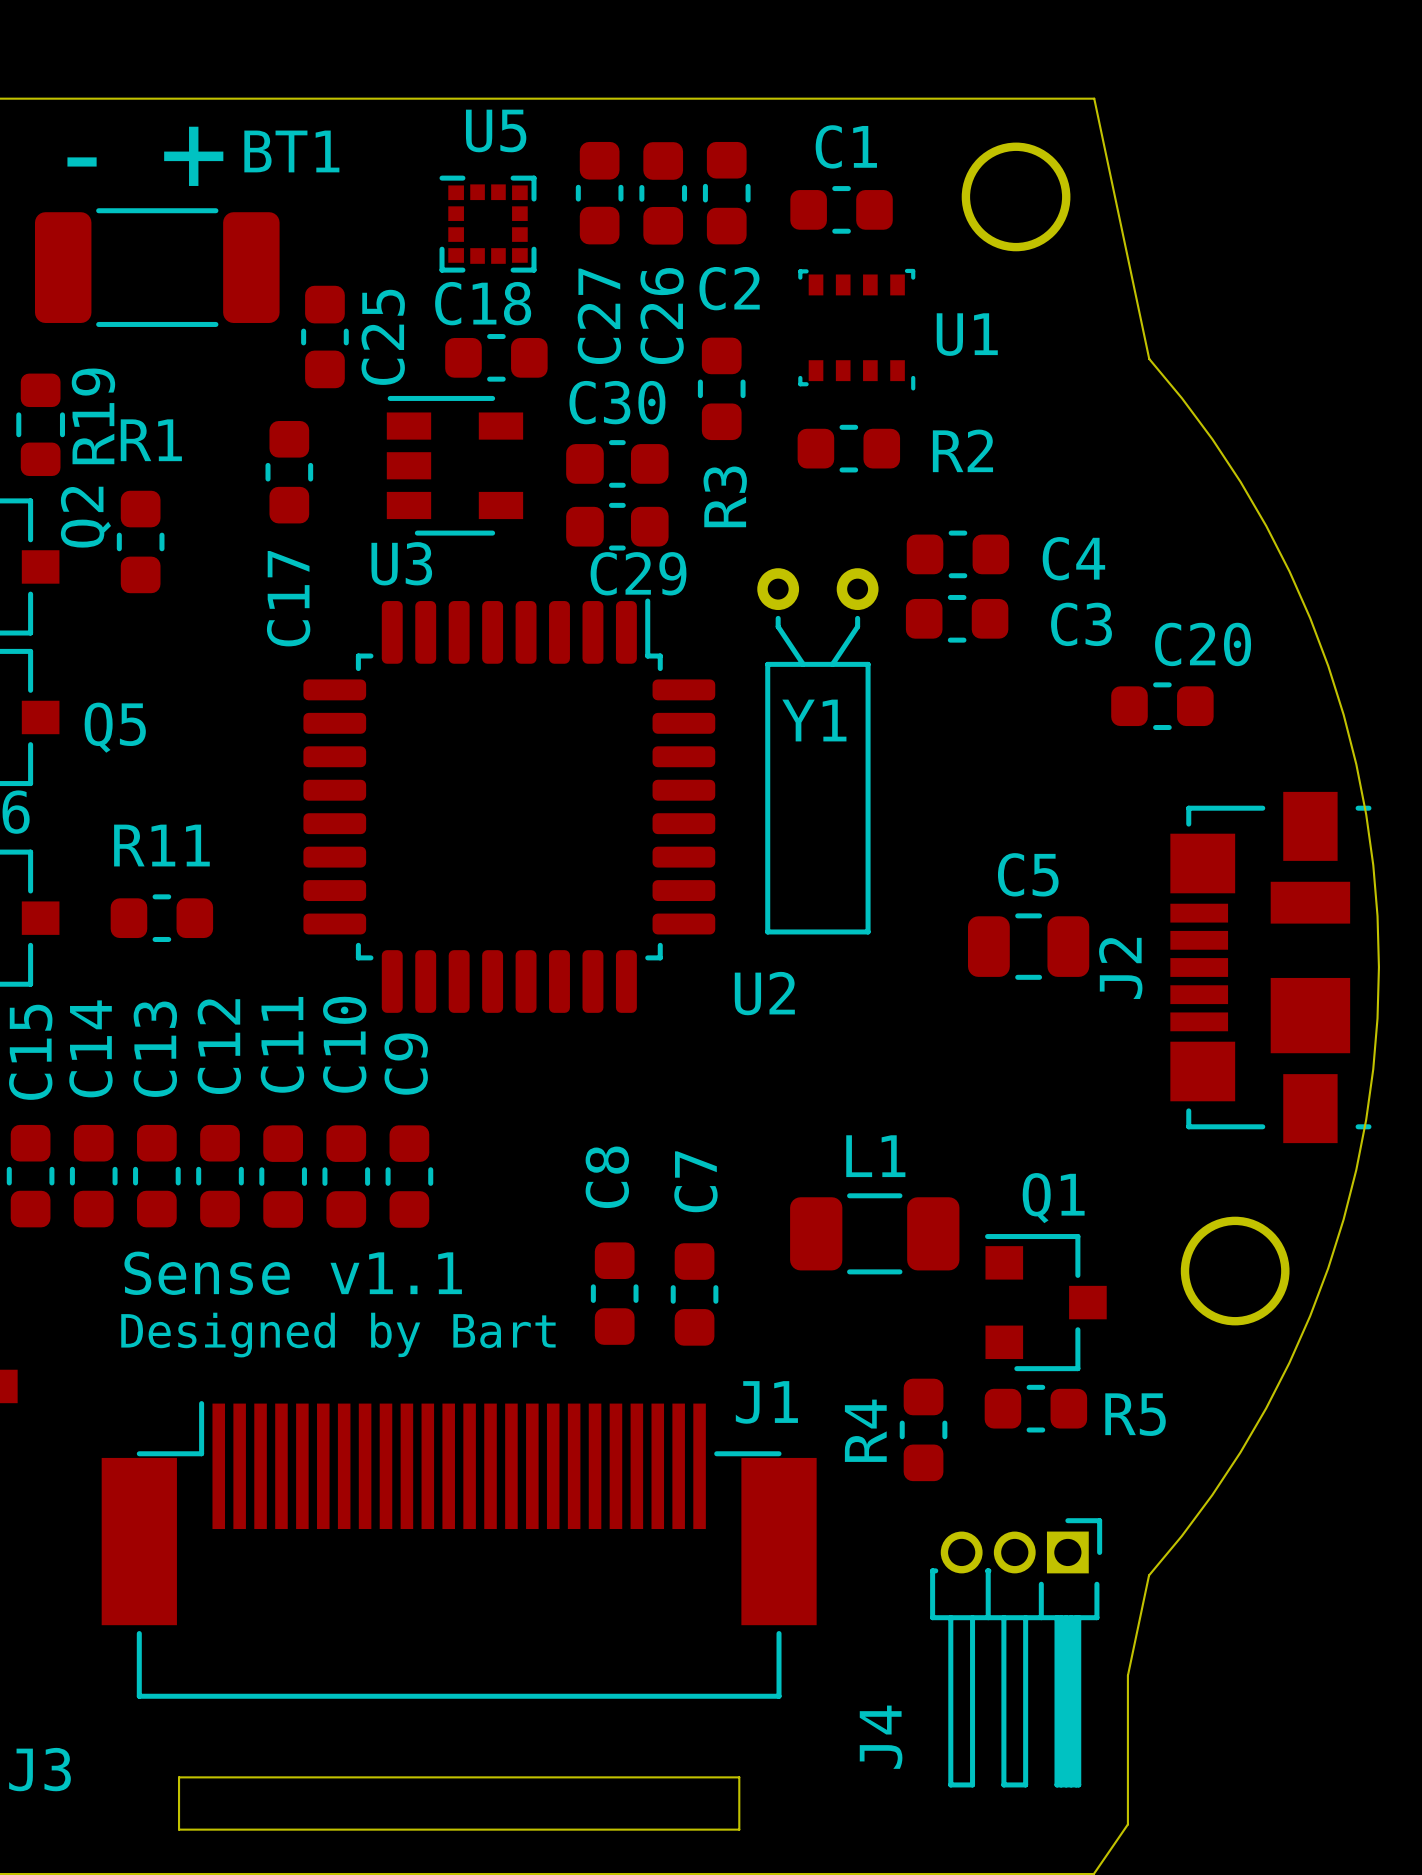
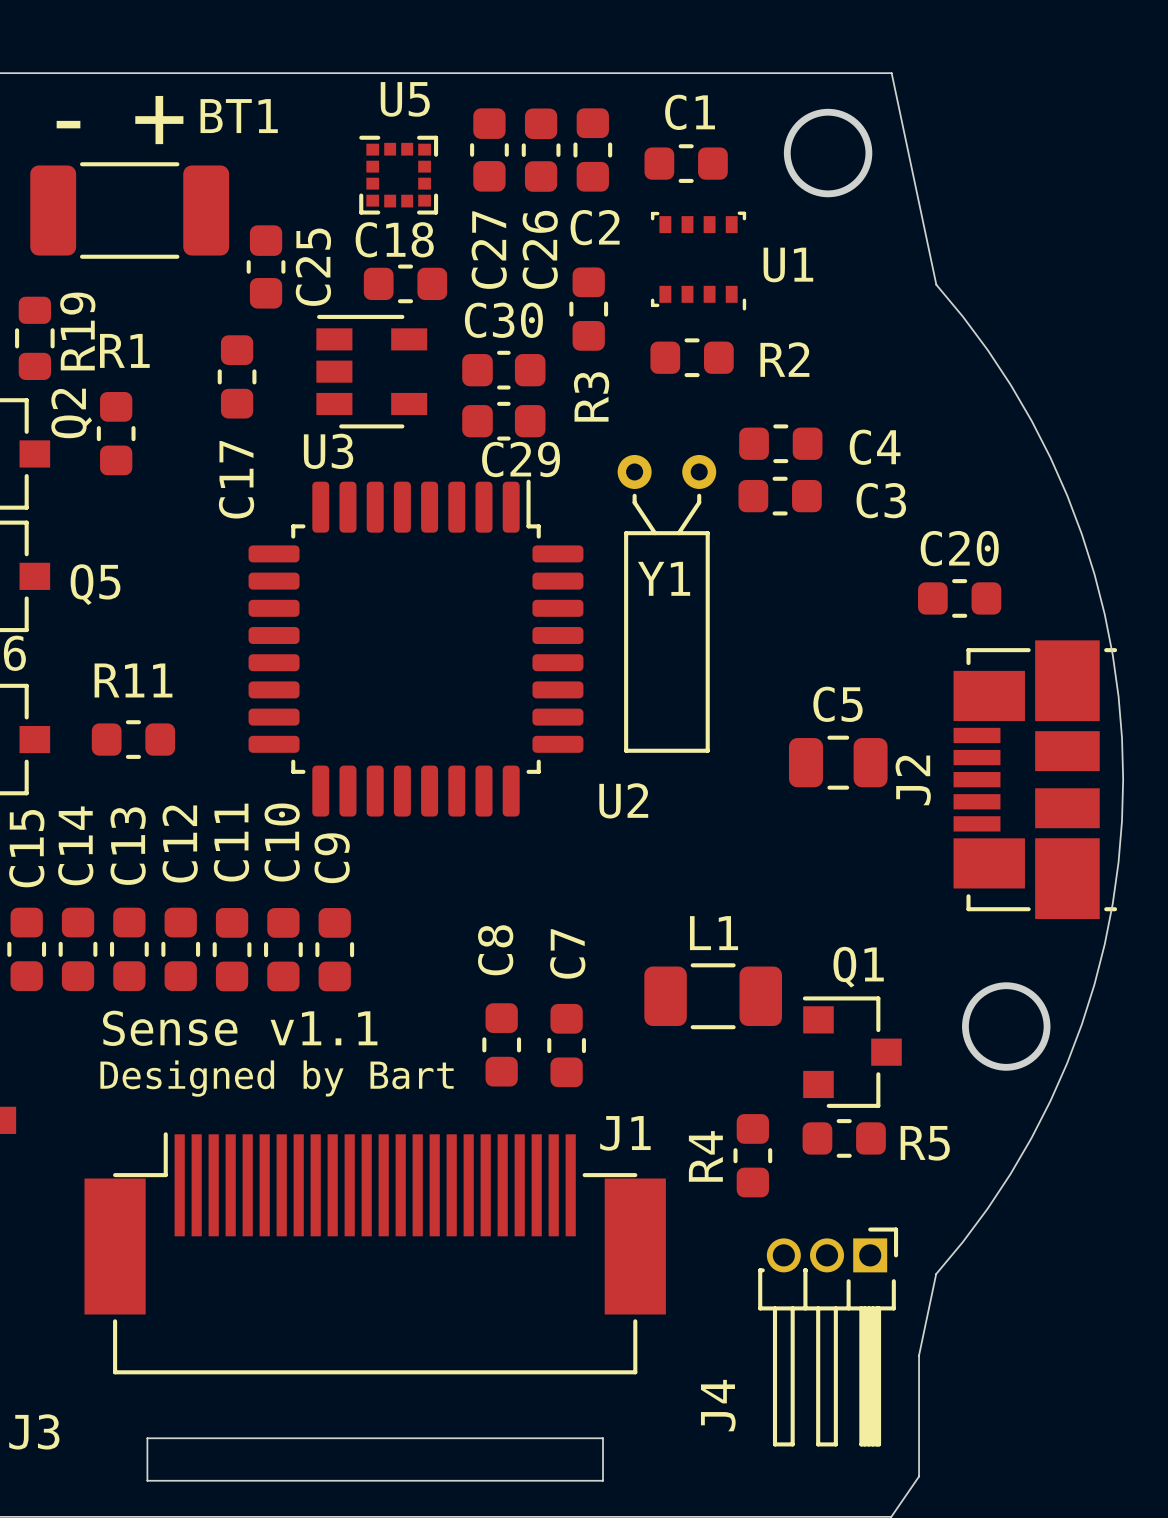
C20 name position: C20 (1203, 644) -> C20 (959, 548)
C20 position: (1162, 706) -> (959, 598)
J2 footprint: [1170, 791, 1372, 1144] -> [953, 640, 1118, 919]

